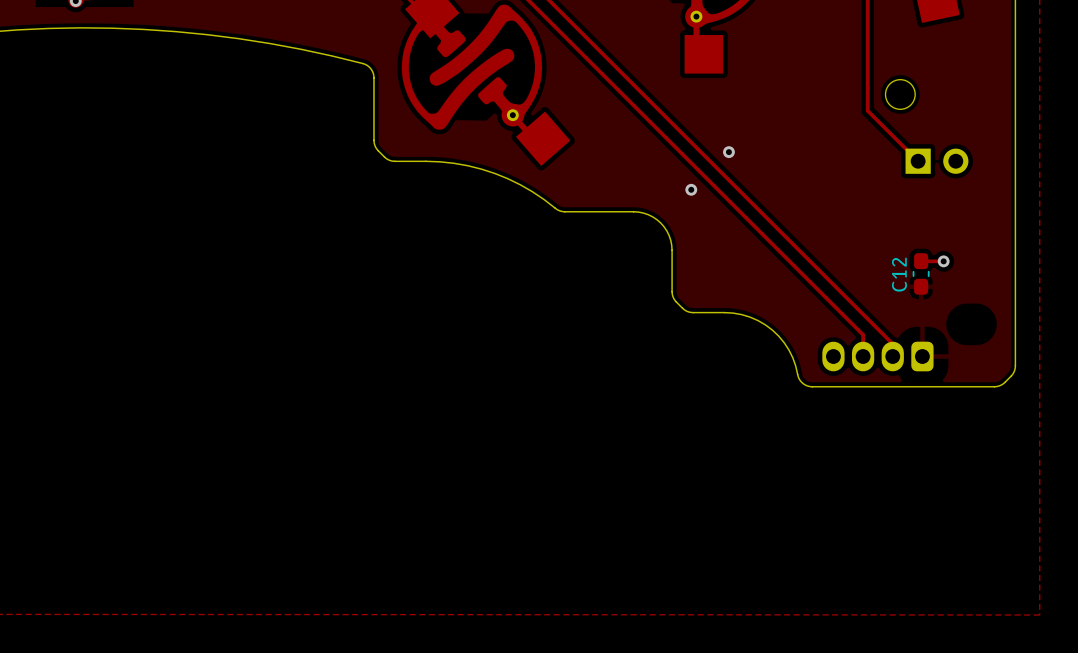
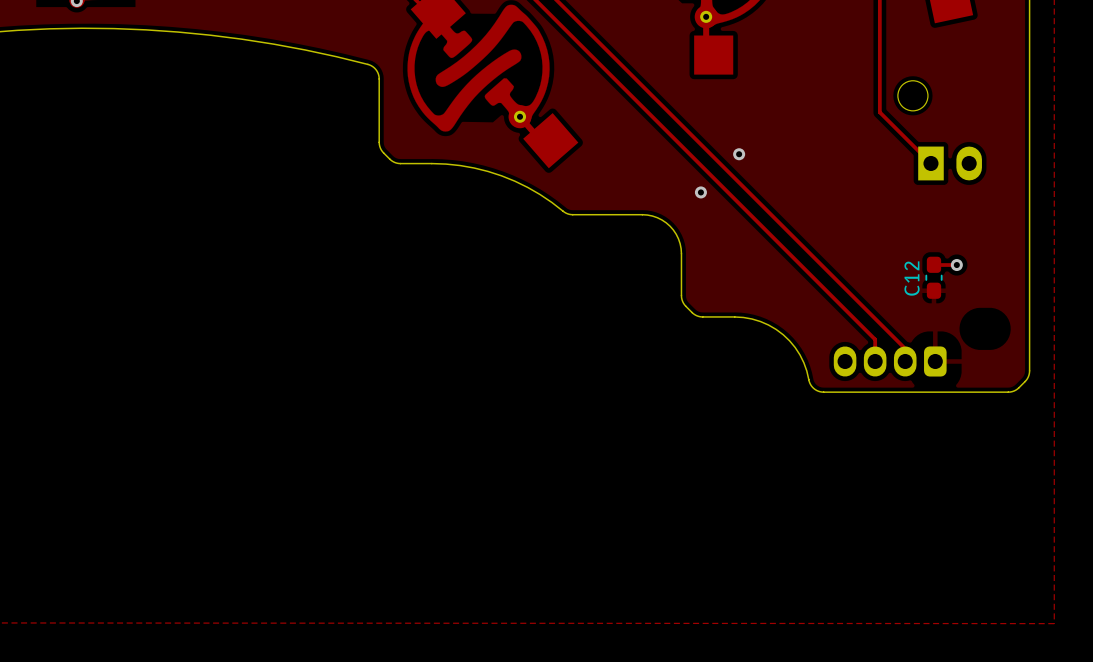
part footprint: [905, 148, 969, 174] -> [918, 146, 982, 181]

